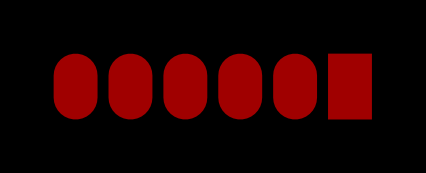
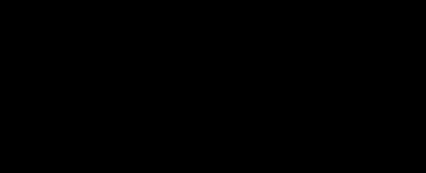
part: (212, 86) -> none

